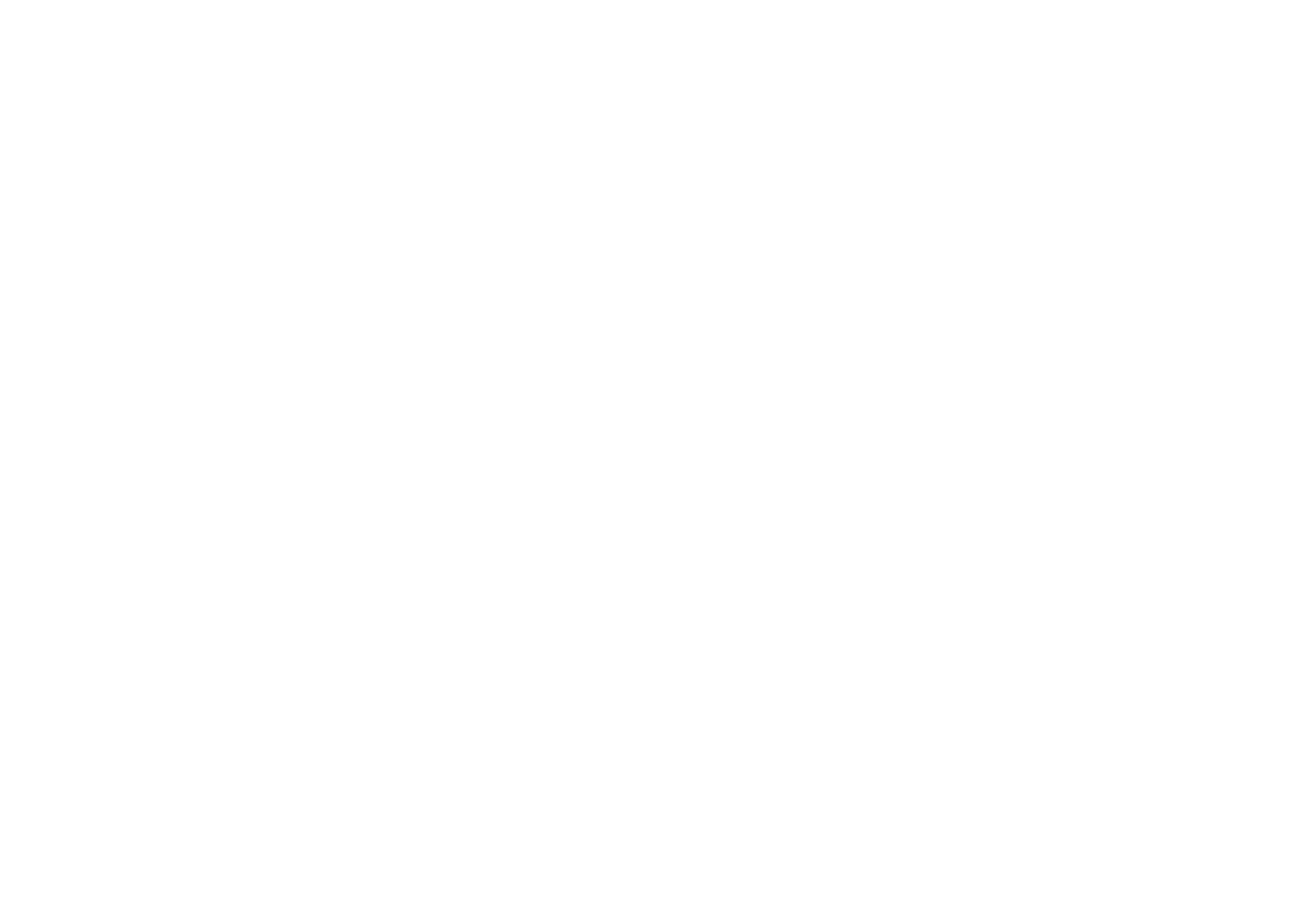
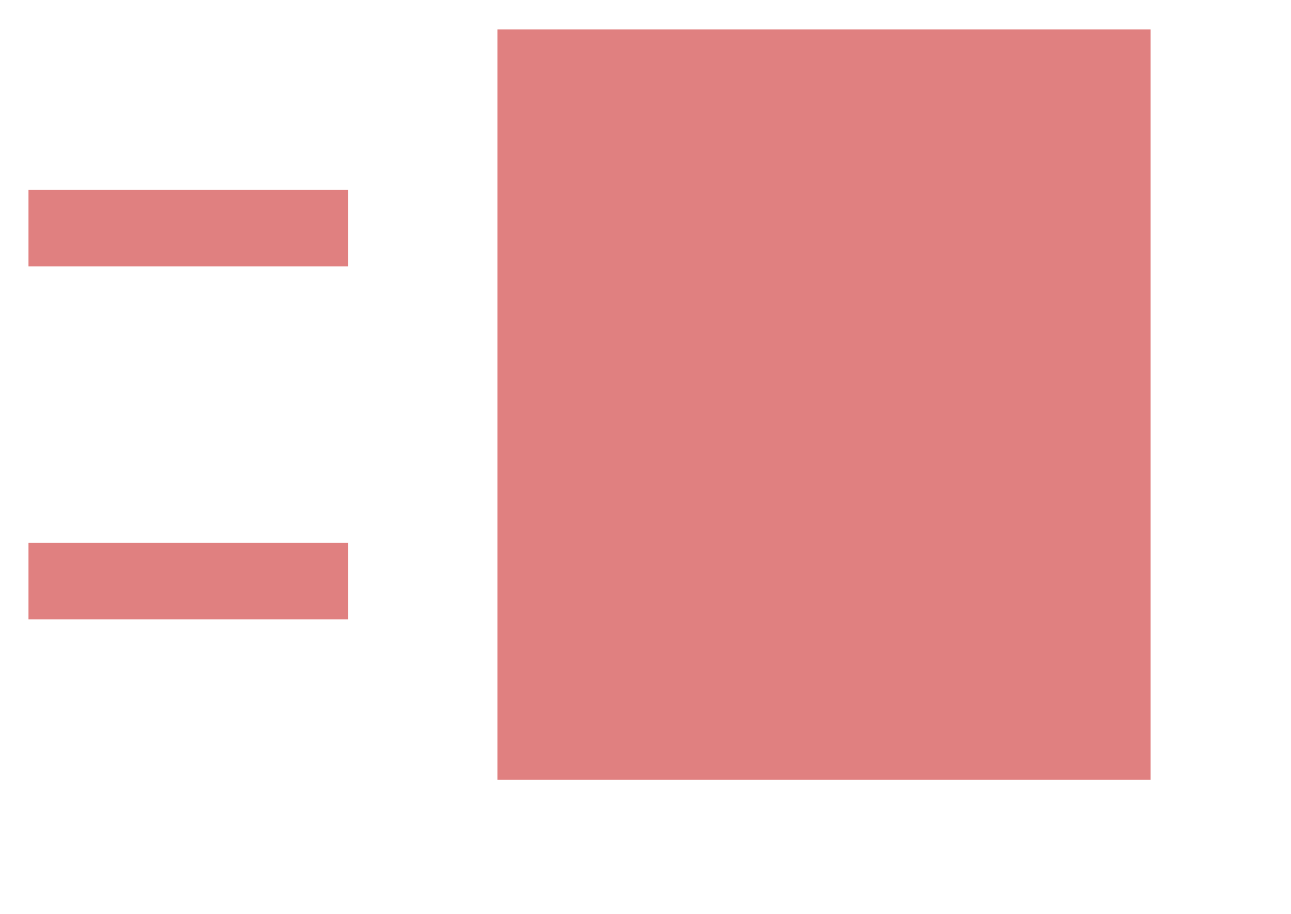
part: none -> (589, 404)

